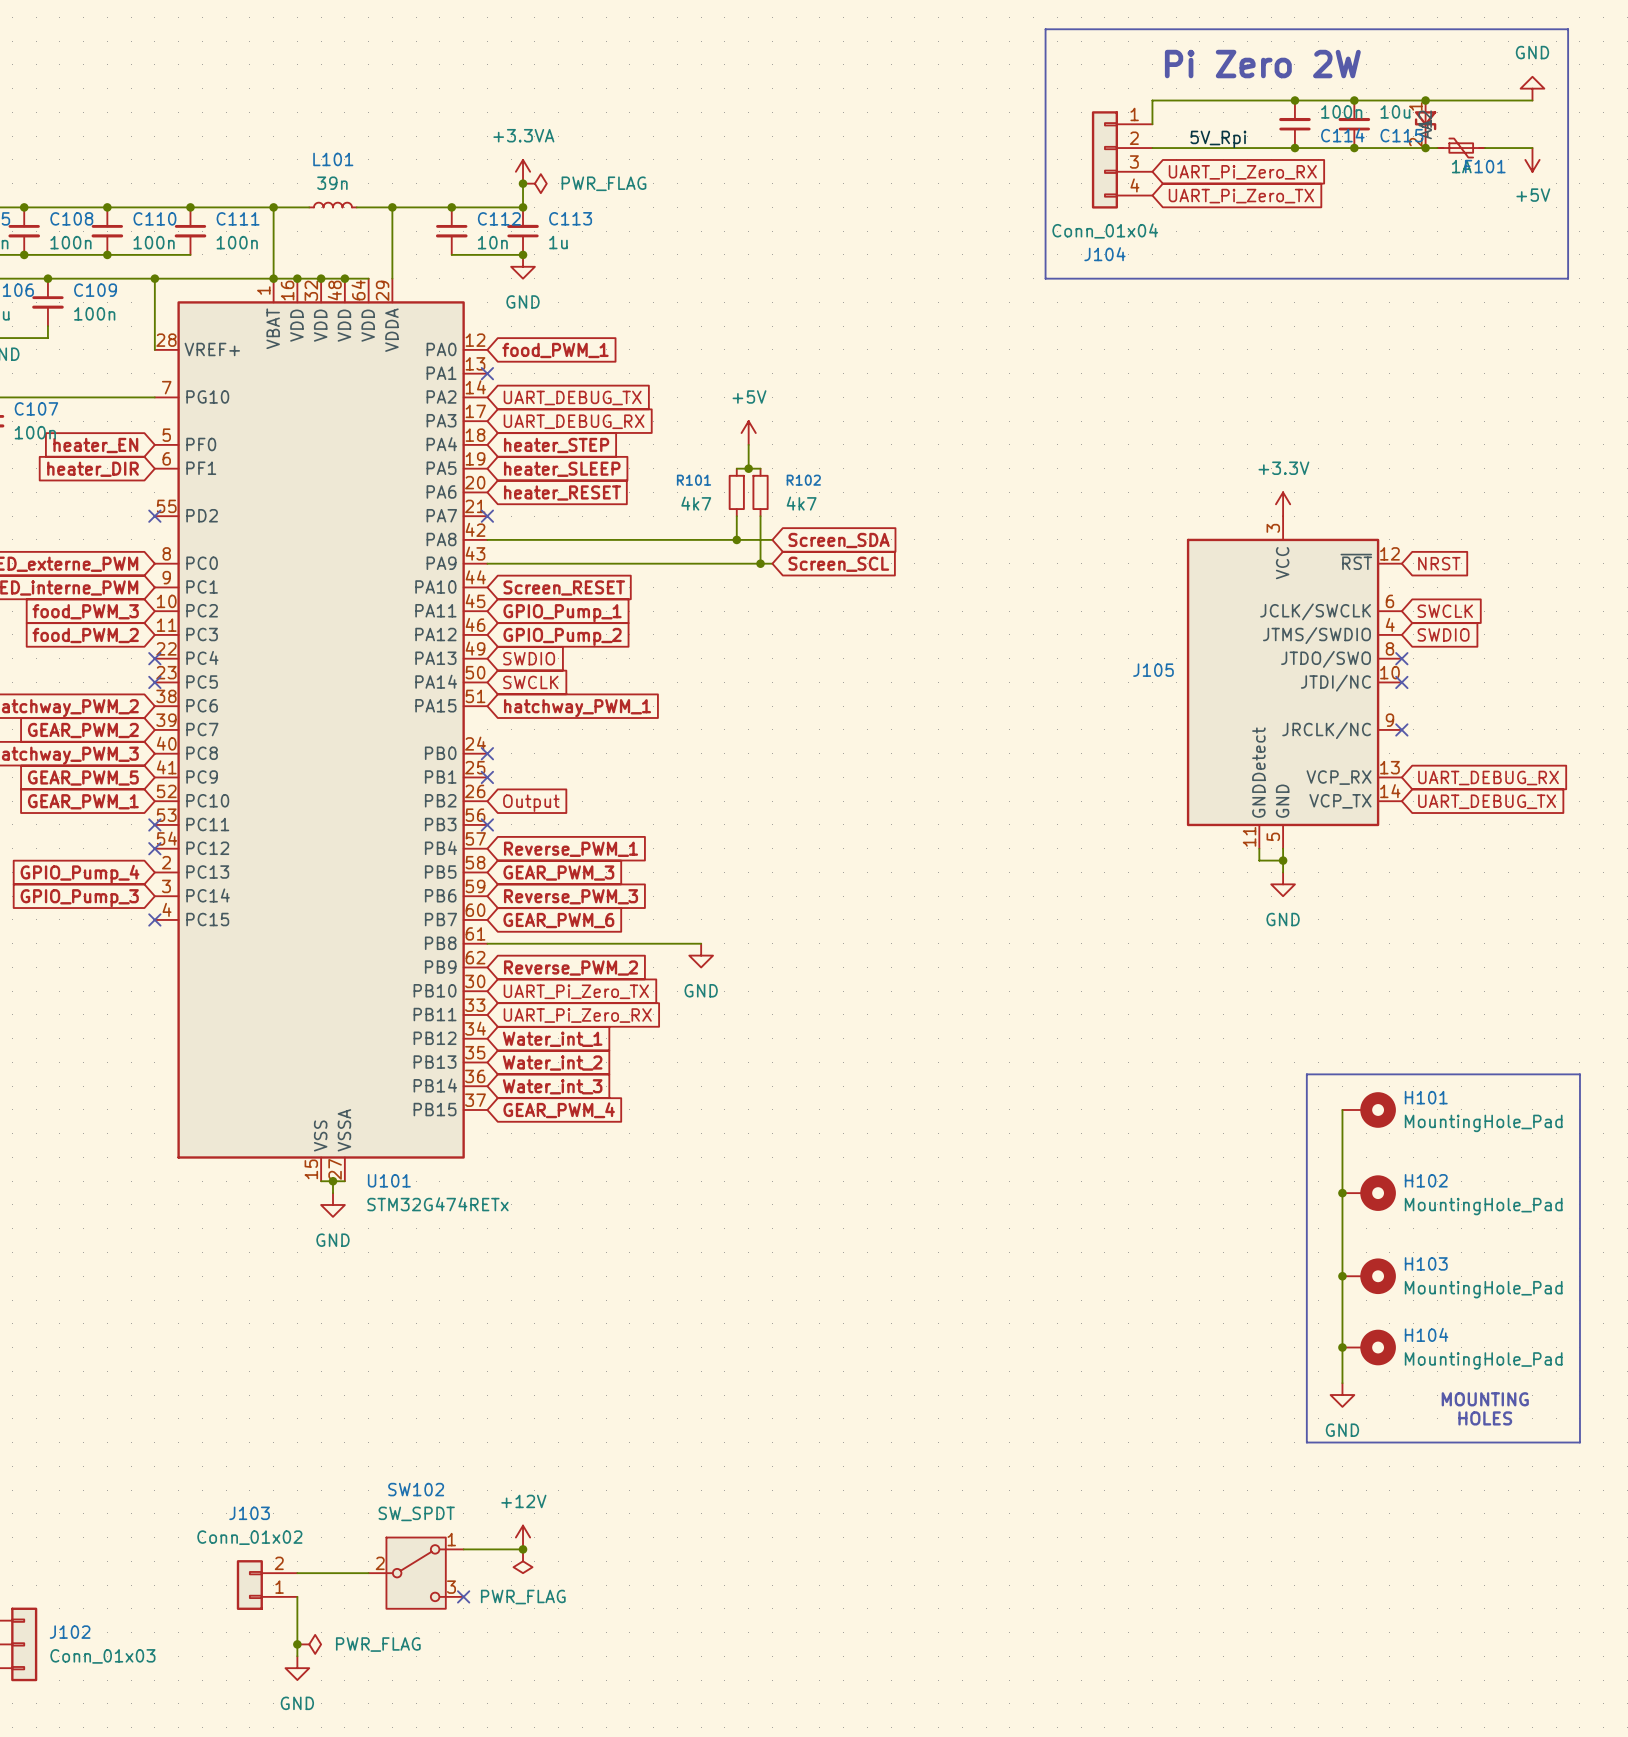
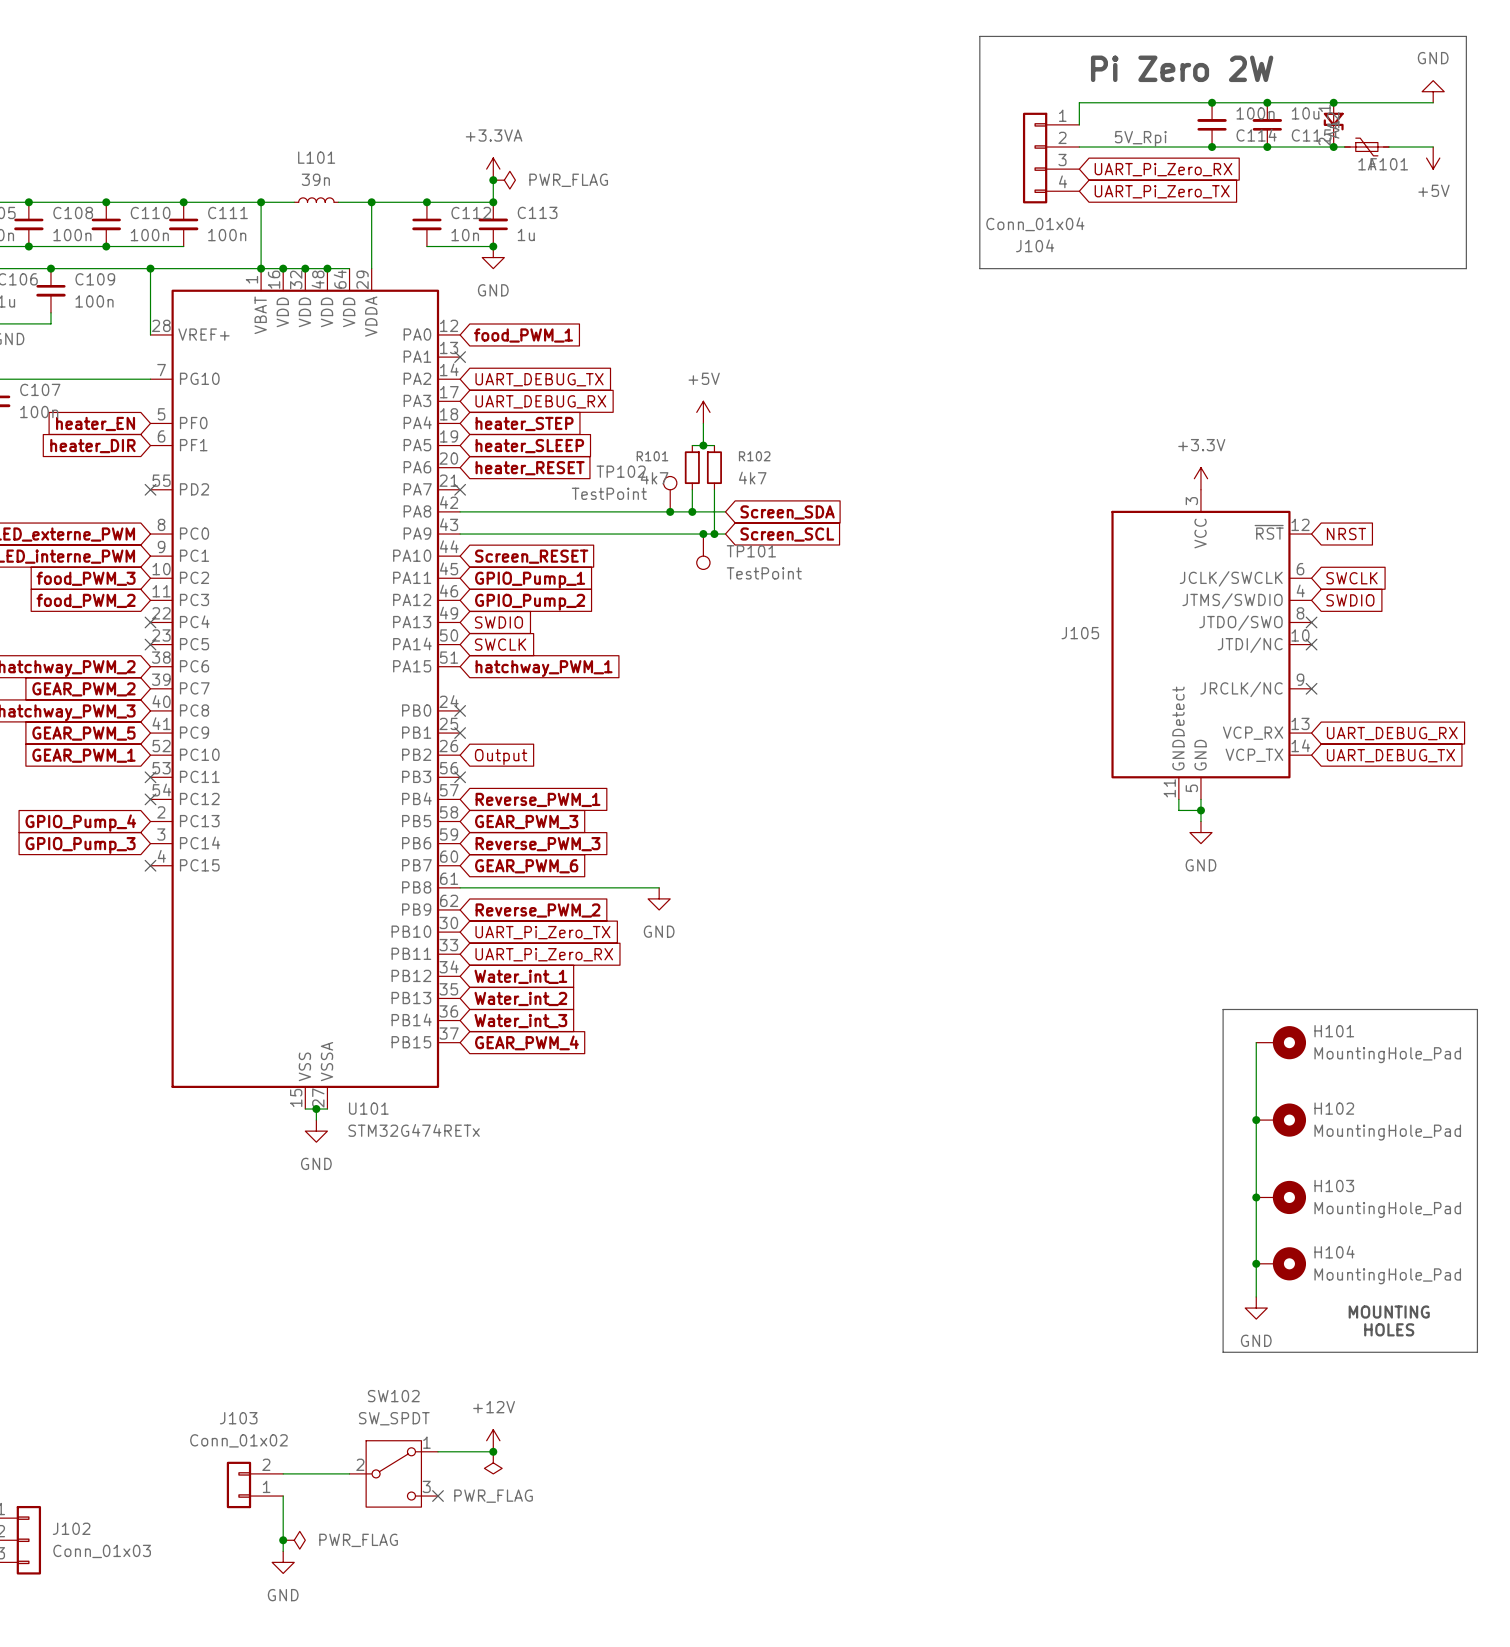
TP102: none -> TestPoint (670, 494)
junction: none -> (670, 511)
junction: none -> (703, 534)
TP101: none -> TestPoint (703, 551)

